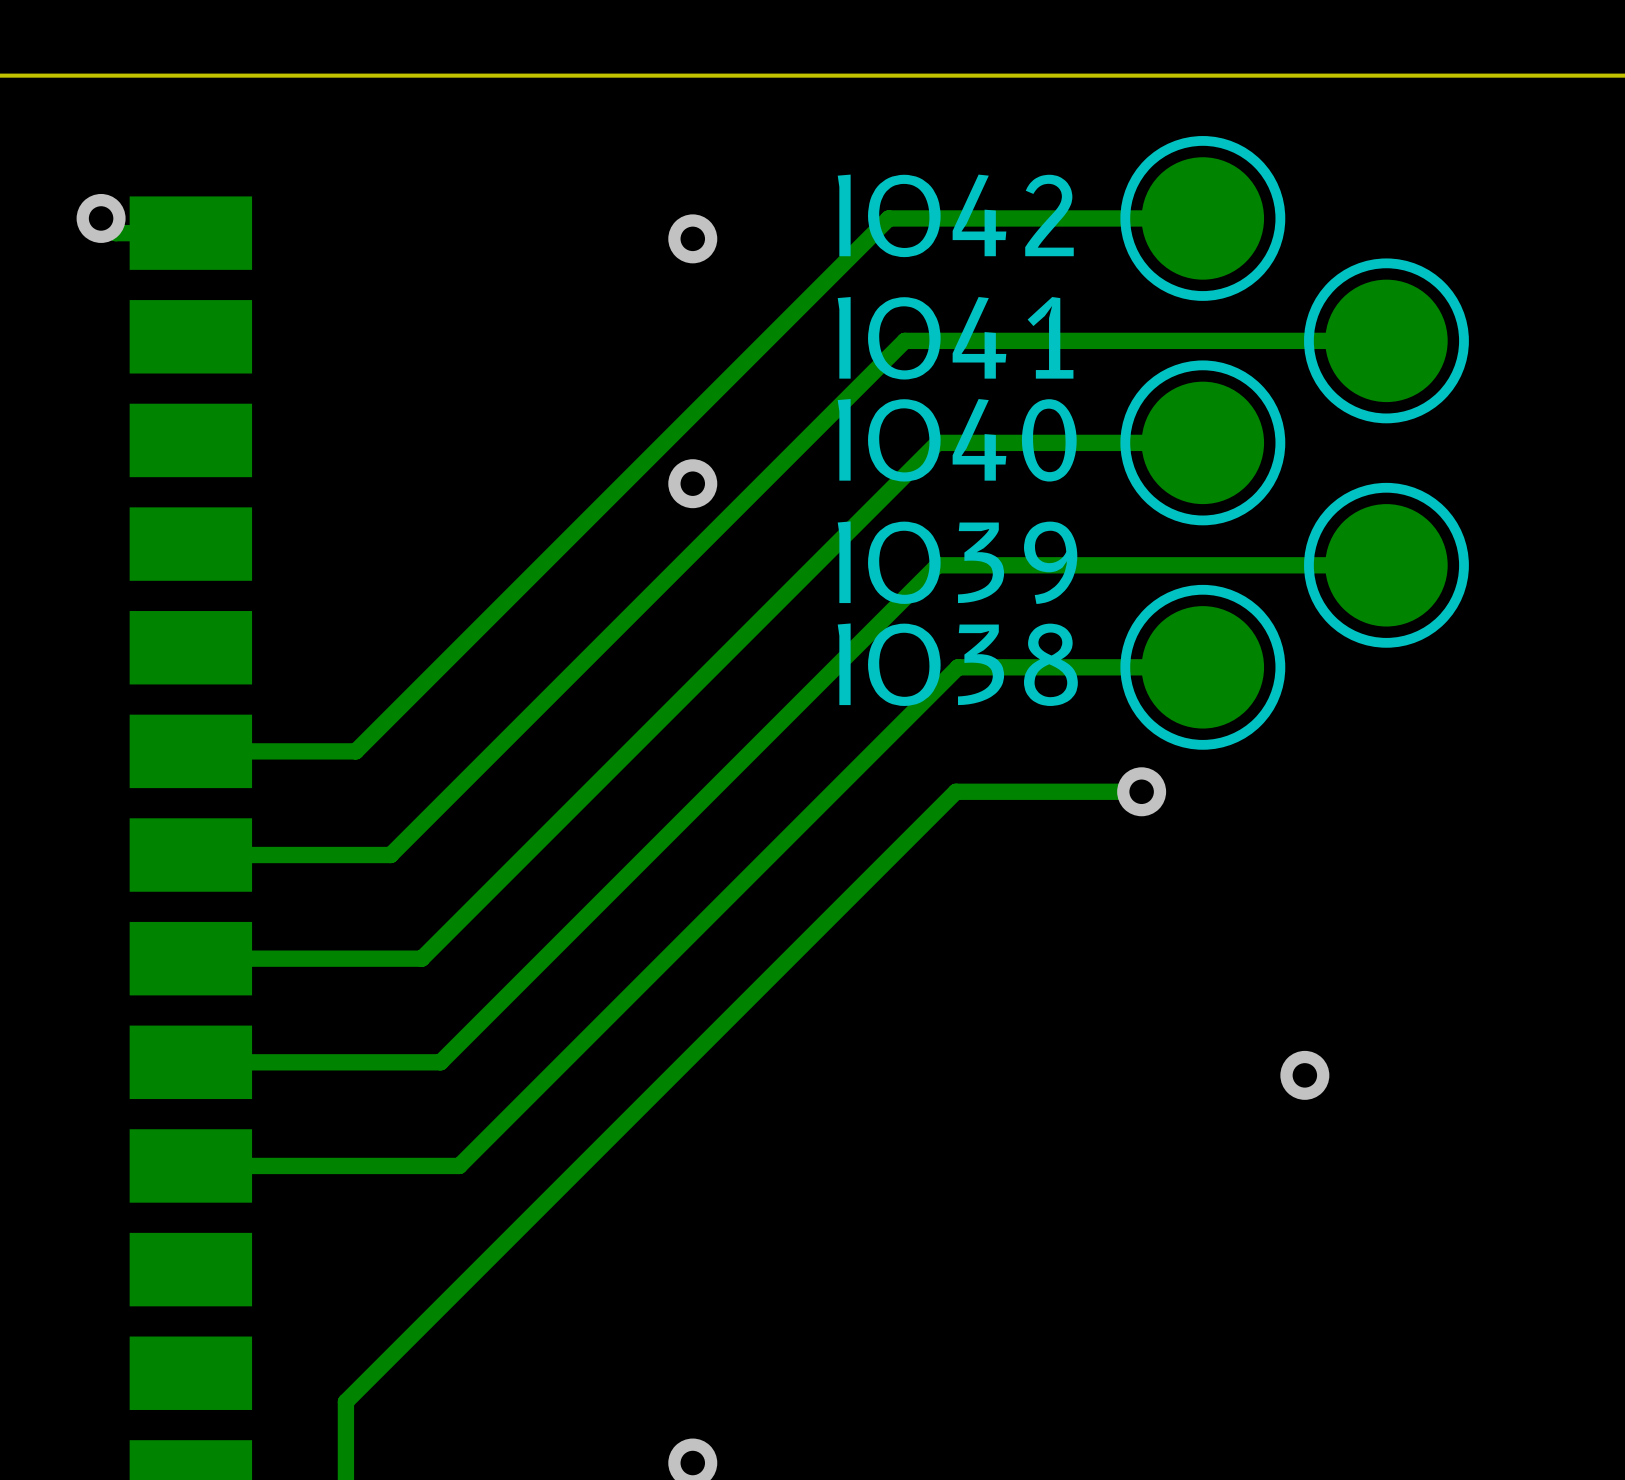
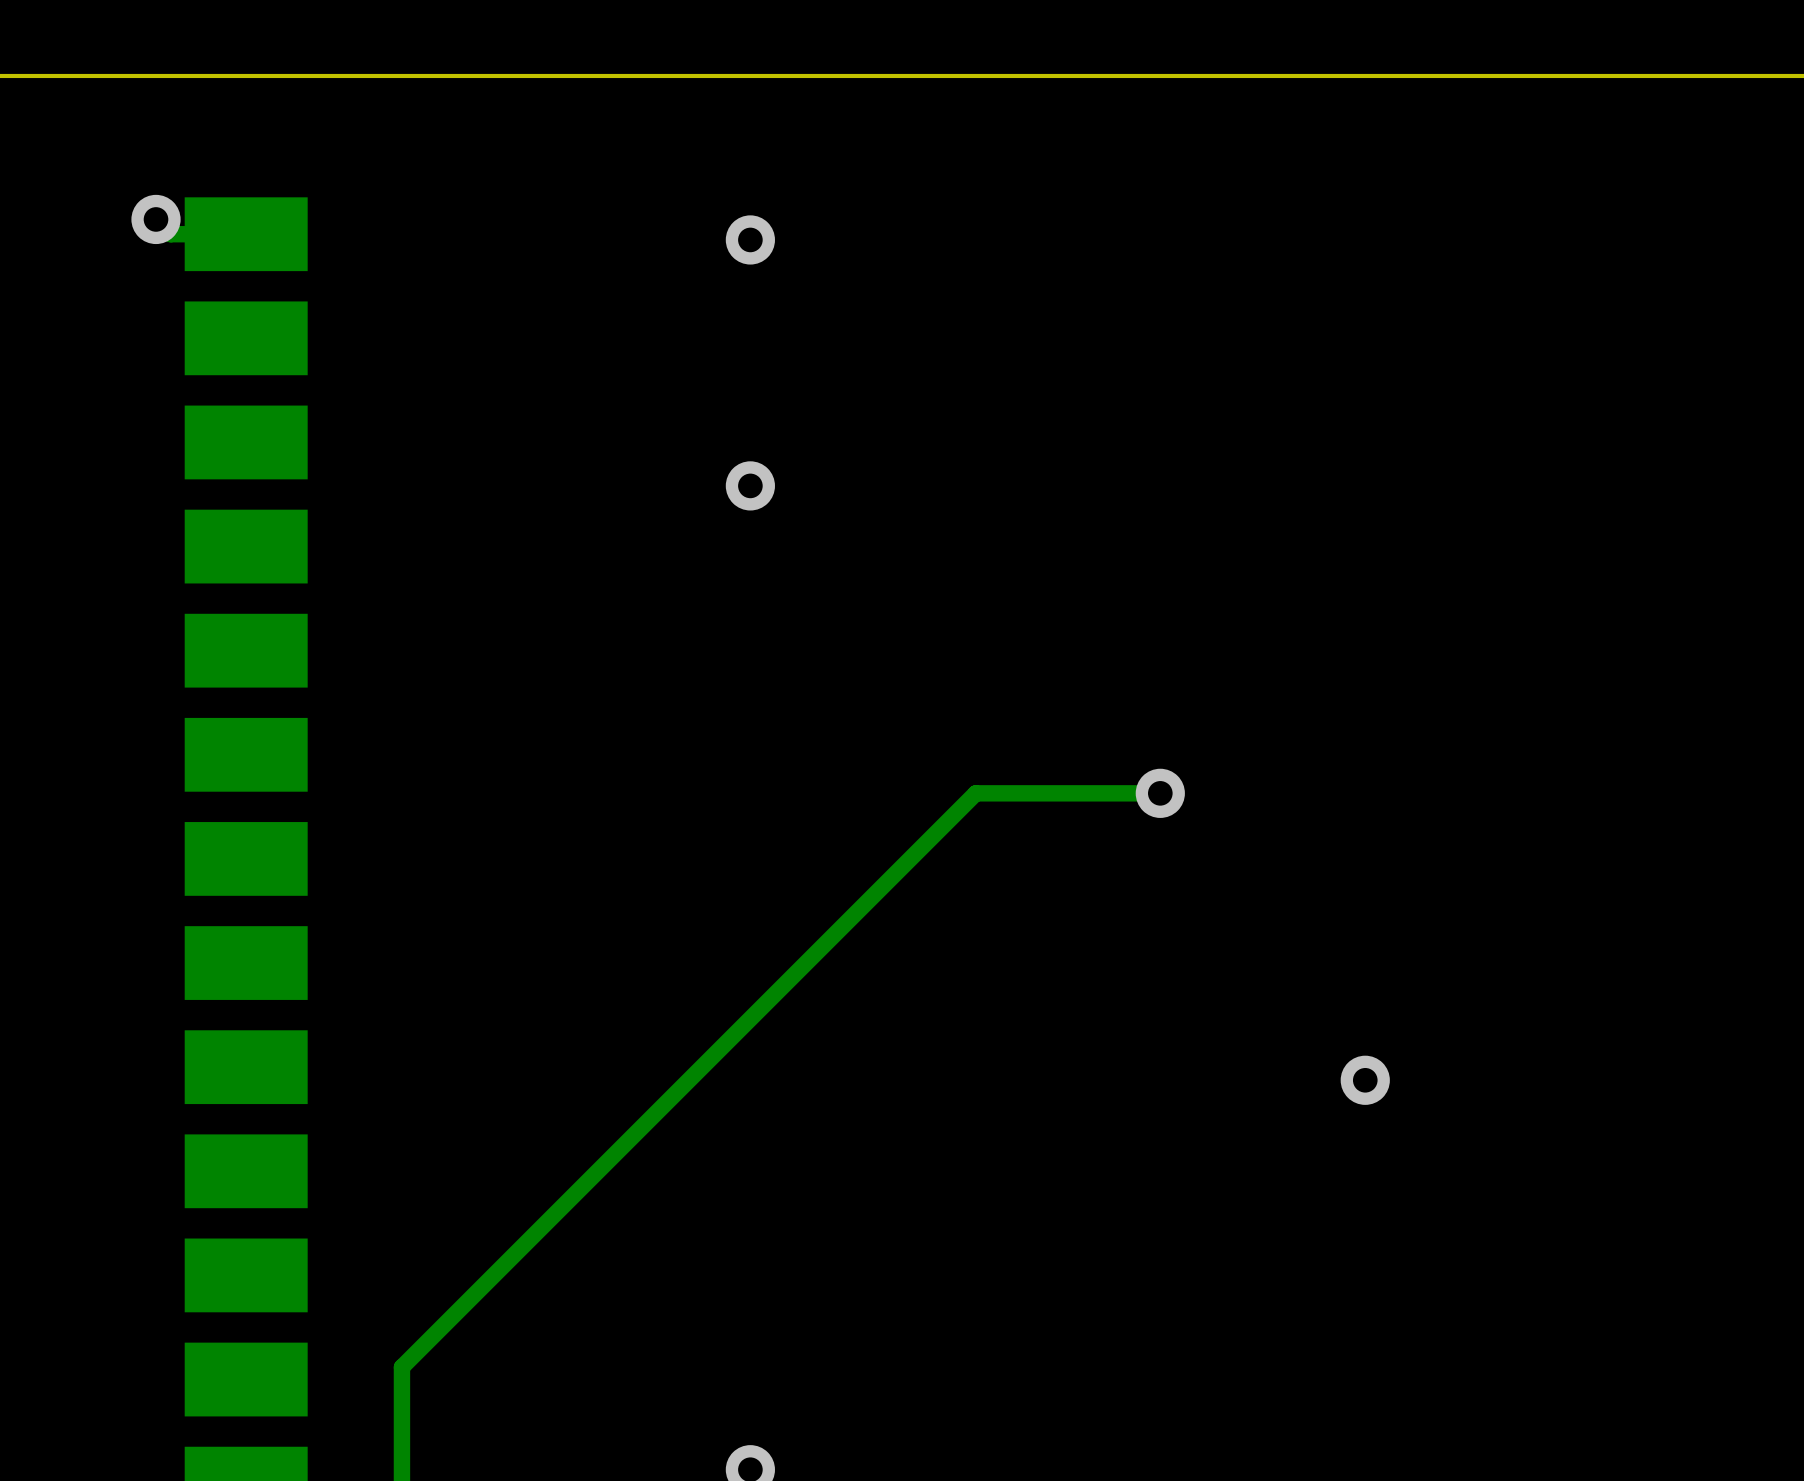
track: (1202, 218) (888, 218) (355, 751) (190, 751) -> none
IO42: (1202, 218) -> none
track: (1386, 340) (904, 340) (390, 855) (190, 855) -> none
IO41: (1386, 340) -> none
track: (1202, 442) (937, 442) (421, 958) (190, 958) -> none
IO40: (1202, 442) -> none
track: (1386, 565) (937, 565) (440, 1062) (190, 1062) -> none
IO39: (1386, 565) -> none
track: (1202, 667) (958, 667) (459, 1165) (190, 1165) -> none
IO38: (1202, 667) -> none
track: (1141, 791) (955, 791) (345, 1401) -> (1160, 793) (975, 793) (401, 1367) (401, 1408)
via position: (1141, 791) -> (1160, 793)

